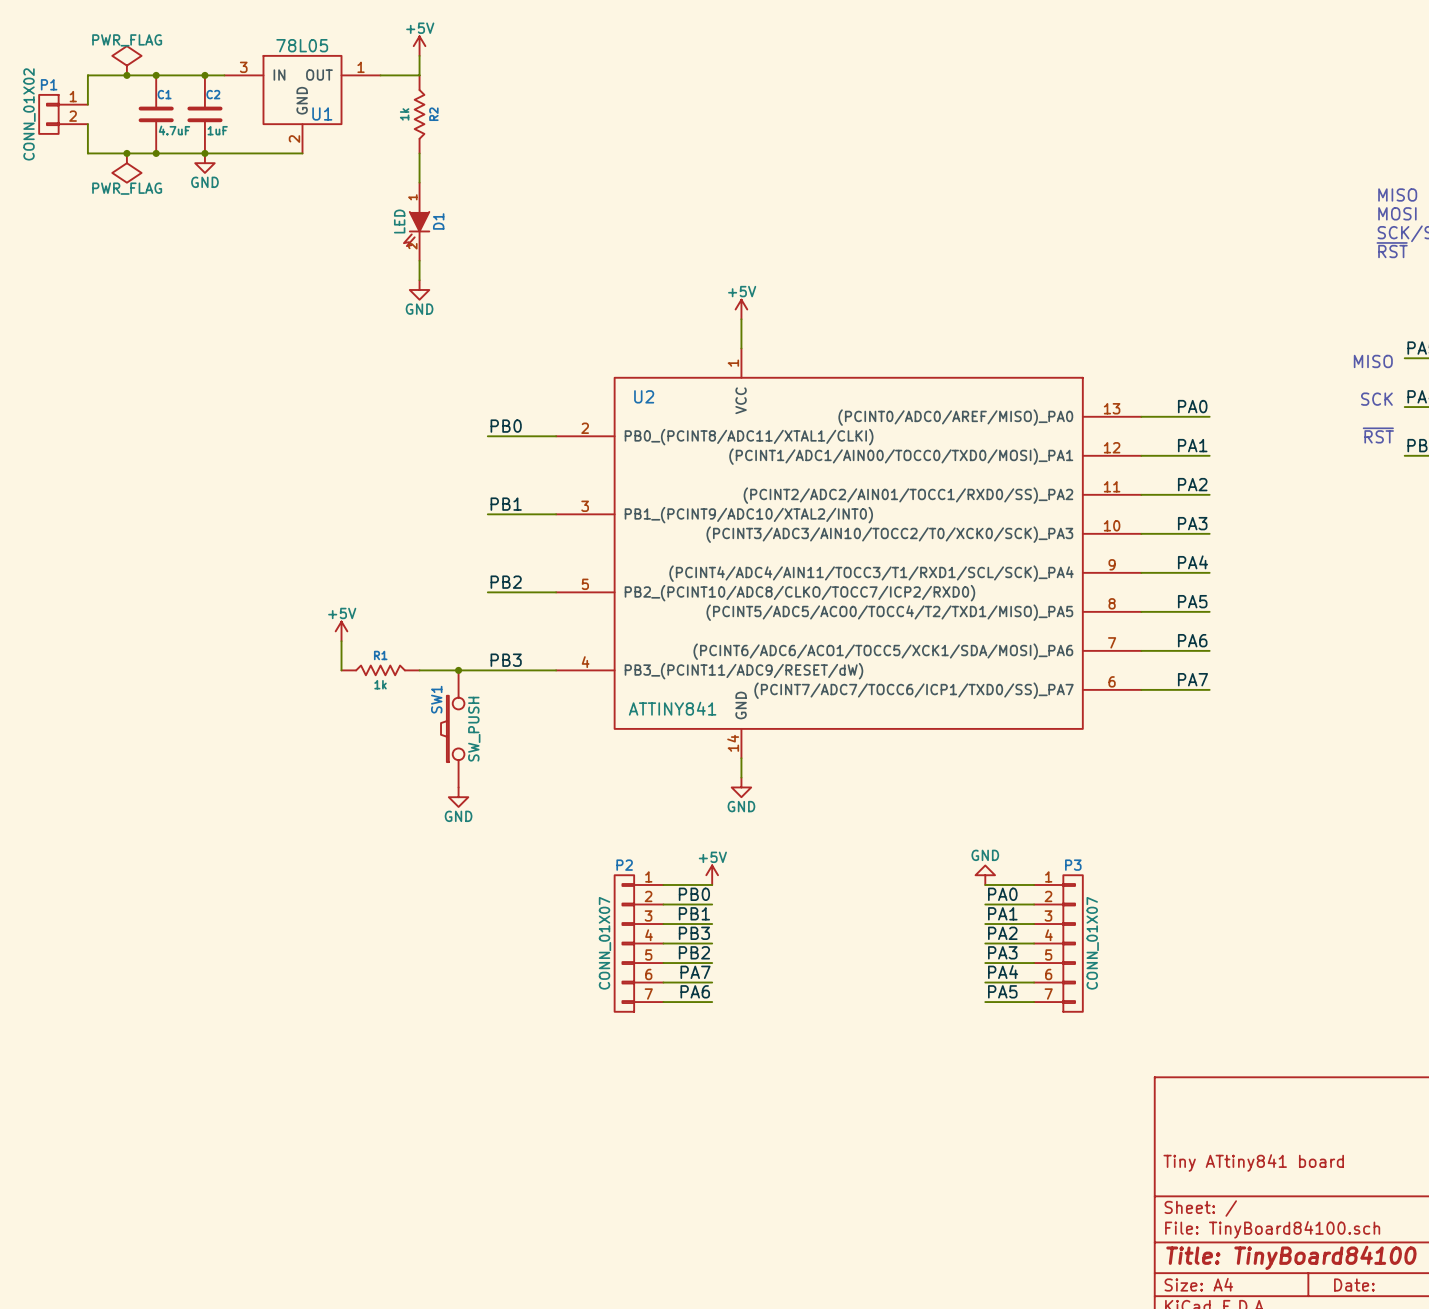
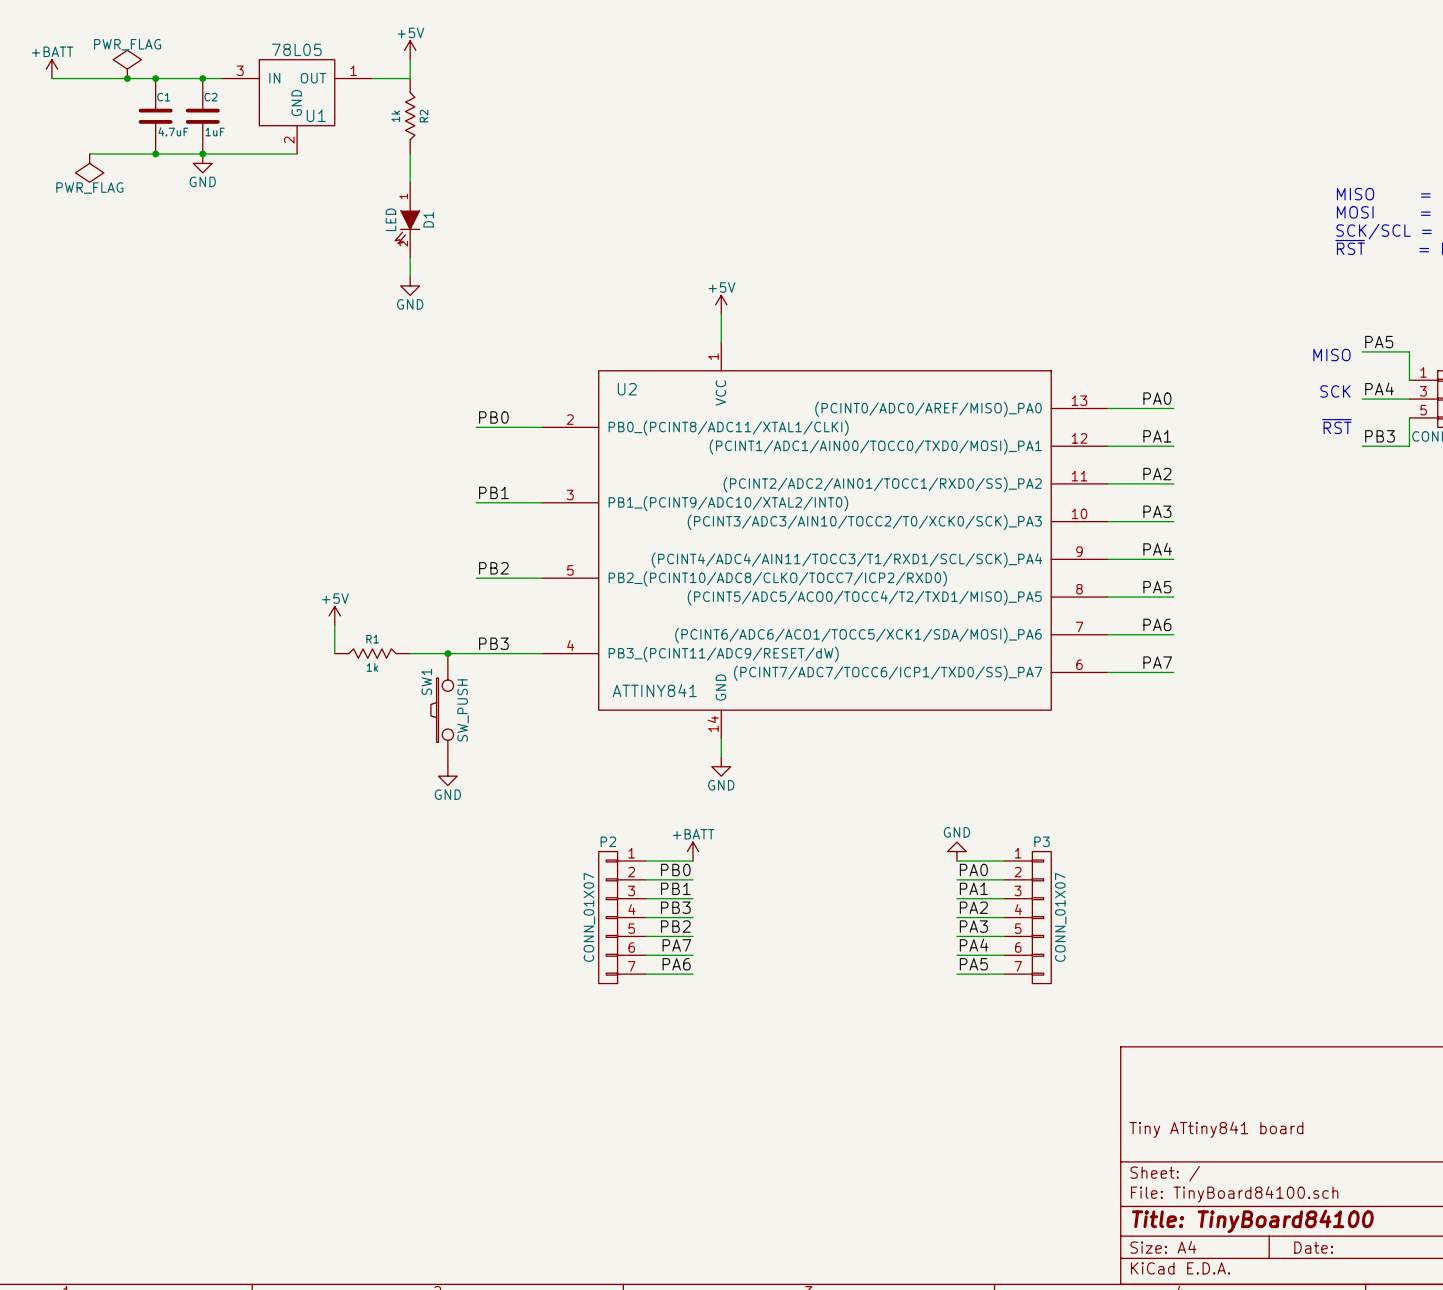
power symbol: none -> +BATT (51, 69)
wire: (87, 75) (87, 104) -> (89, 78) (51, 78)
P1: CONN_01X02 (63, 114) -> none
wire: (87, 124) (87, 153) -> none
junction: (126, 153) -> none
power symbol position: PWR_FLAG (126, 168) -> PWR_FLAG (89, 168)
power symbol: +5V (712, 875) -> +BATT (692, 851)

